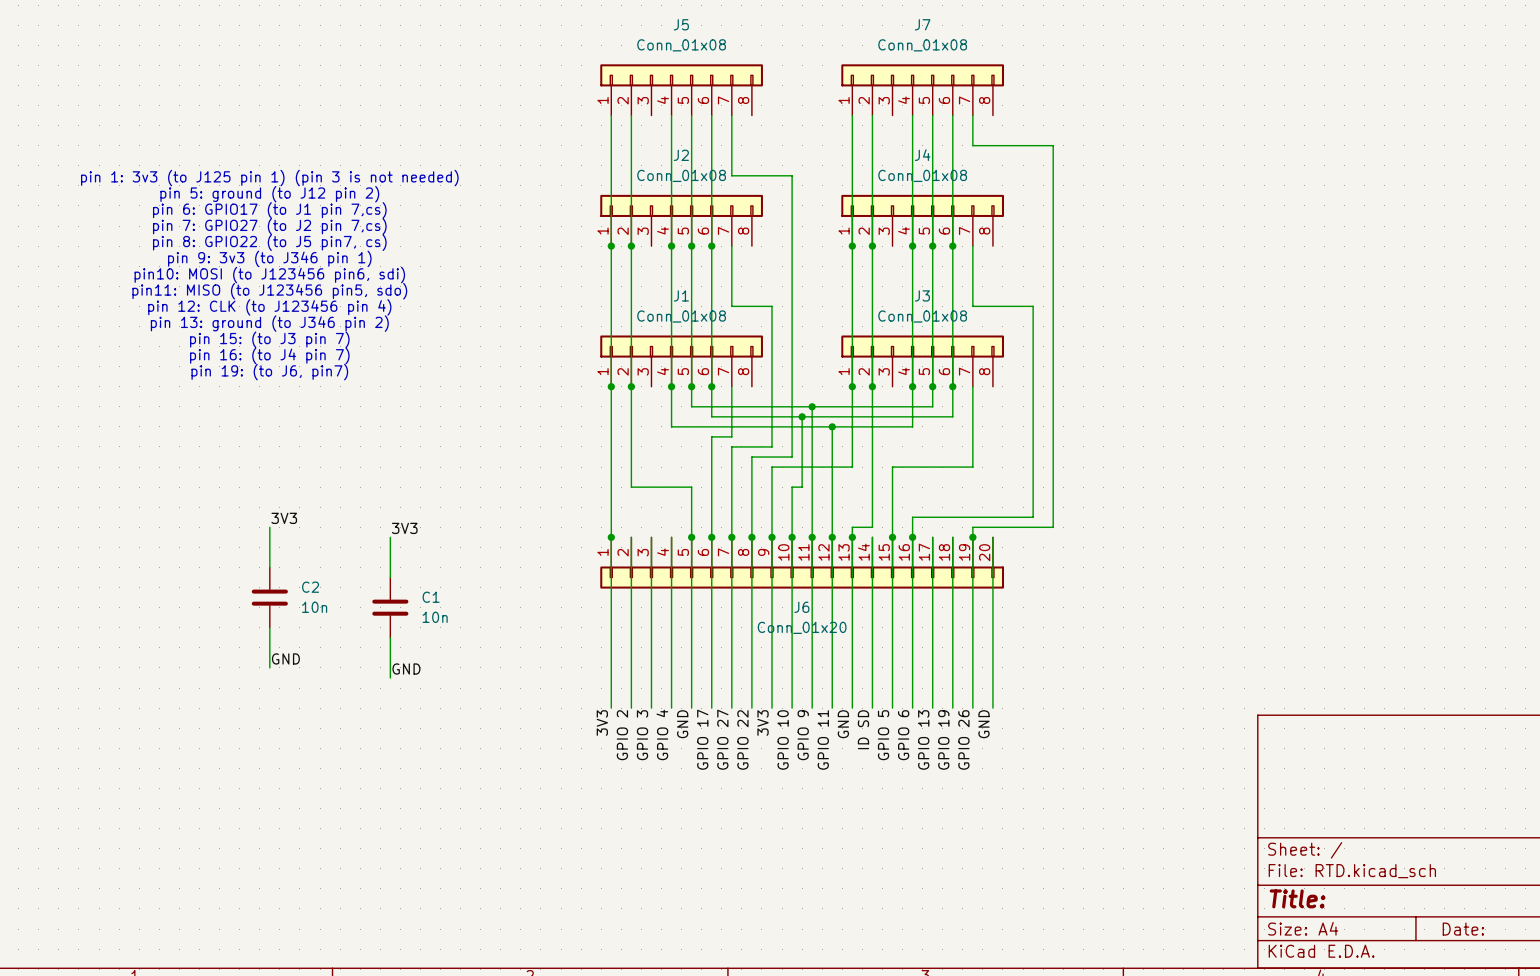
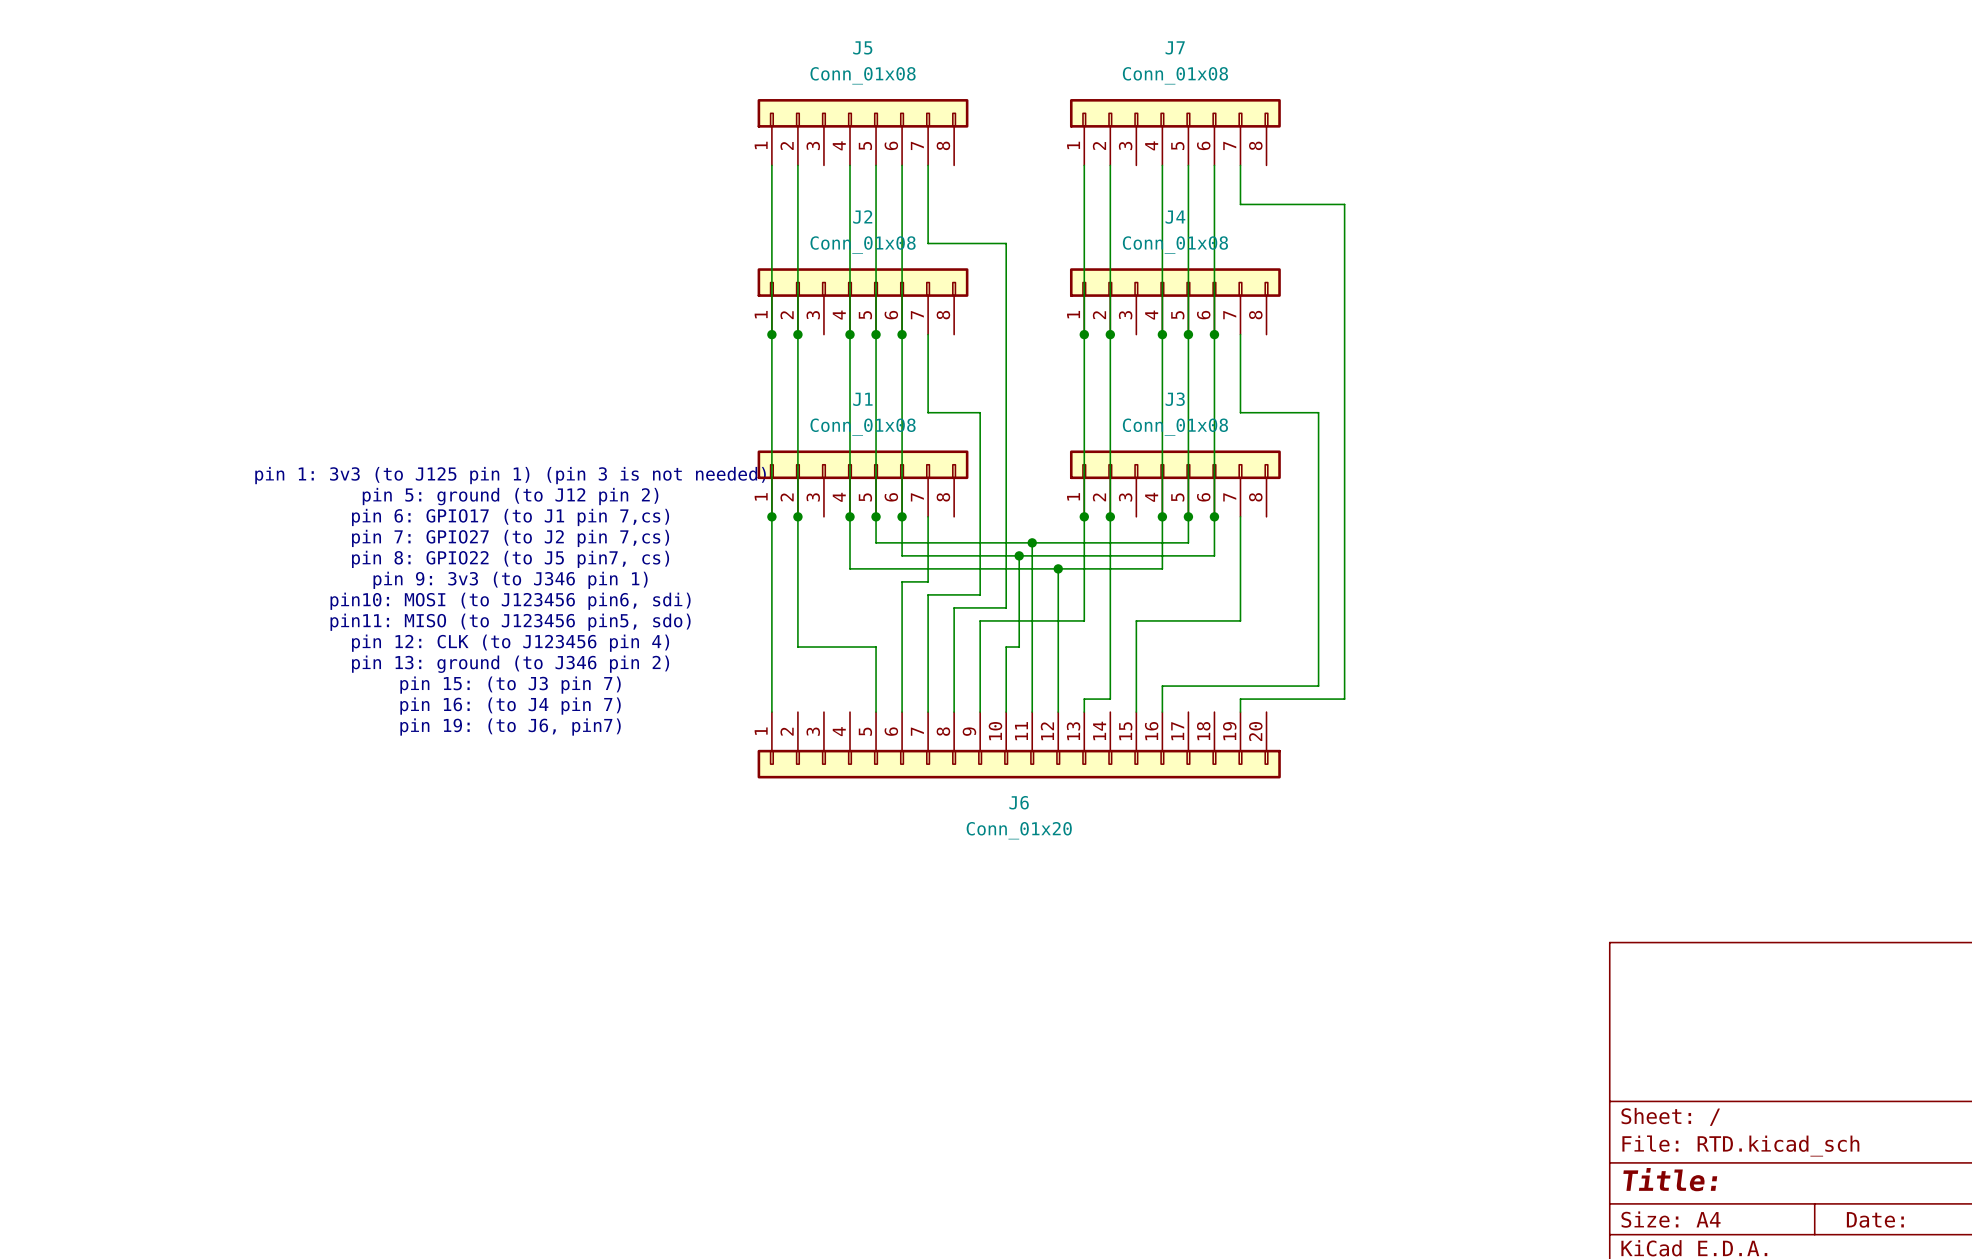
text: pin 1: 3v3 (to J125 pin 1) (pin 3 is not needed) (269, 178) -> none
text: pin 5: ground (to J12 pin 2) (269, 194) -> none
text: pin 6: GPIO17 (to J1 pin 7,cs) (269, 210) -> none
text: pin 7: GPIO27 (to J2 pin 7,cs) (269, 226) -> none
text: pin 8: GPIO22 (to J5 pin7, cs) (269, 242) -> none
text: pin 9: 3v3 (to J346 pin 1) (269, 258) -> none
text: pin10: MOSI (to J123456 pin6, sdi) (269, 275) -> none
text: pin11: MISO (to J123456 pin5, sdo) (269, 291) -> none
text: pin 12: CLK (to J123456 pin 4) (269, 307) -> none
text: pin 13: ground (to J346 pin 2) (269, 323) -> none
text: pin 15: (to J3 pin 7) (269, 339) -> none
text: none -> pin 1: 3v3 (to J125 pin 1) (pin 3 is not needed) (510, 475)
text: pin 16: (to J4 pin 7) (269, 355) -> none
text: none -> pin 5: ground (to J12 pin 2) (510, 496)
text: pin 19: (to J6, pin7) (269, 372) -> none
text: none -> pin 6: GPIO17 (to J1 pin 7,cs) (510, 517)
text: none -> pin 7: GPIO27 (to J2 pin 7,cs) (510, 538)
text: none -> pin 8: GPIO22 (to J5 pin7, cs) (510, 559)
text: none -> pin 9: 3v3 (to J346 pin 1) (510, 580)
text: none -> pin10: MOSI (to J123456 pin6, sdi) (510, 601)
text: none -> pin11: MISO (to J123456 pin5, sdo) (510, 622)
text: none -> pin 12: CLK (to J123456 pin 4) (510, 643)
text: none -> pin 13: ground (to J346 pin 2) (510, 664)
text: none -> pin 15: (to J3 pin 7) (510, 685)
label: 3V3 (284, 518) -> none
wire: (269, 527) (269, 567) -> none
label: 3V3 (404, 528) -> none
text: none -> pin 16: (to J4 pin 7) (510, 706)
wire: (390, 537) (390, 577) -> none
wire: (611, 537) (611, 708) -> none
junction: (611, 537) -> none
wire: (631, 537) (631, 708) -> none
wire: (651, 537) (651, 708) -> none
wire: (671, 537) (671, 708) -> none
wire: (691, 537) (691, 708) -> none
junction: (691, 537) -> none
wire: (711, 537) (711, 708) -> none
junction: (711, 537) -> none
wire: (731, 537) (731, 708) -> none
junction: (731, 537) -> none
wire: (751, 537) (751, 708) -> none
junction: (751, 537) -> none
wire: (771, 537) (771, 708) -> none
junction: (771, 537) -> none
wire: (792, 537) (792, 708) -> none
junction: (792, 537) -> none
wire: (812, 537) (812, 708) -> none
junction: (812, 537) -> none
wire: (832, 537) (832, 708) -> none
junction: (832, 537) -> none
wire: (852, 537) (852, 708) -> none
junction: (852, 537) -> none
wire: (872, 537) (872, 708) -> none
wire: (892, 537) (892, 708) -> none
junction: (892, 537) -> none
wire: (912, 537) (912, 708) -> none
junction: (912, 537) -> none
wire: (932, 537) (932, 708) -> none
wire: (952, 537) (952, 708) -> none
wire: (972, 537) (972, 708) -> none
junction: (972, 537) -> none
wire: (992, 537) (992, 708) -> none
text: none -> pin 19: (to J6, pin7) (510, 727)
C2: 10n (269, 597) -> none
C1: 10n (390, 607) -> none
wire: (269, 627) (269, 667) -> none
wire: (390, 637) (390, 677) -> none
label: GND (285, 658) -> none
label: GND (406, 669) -> none
label: 3V3 (602, 723) -> none
label: 3V3 (763, 723) -> none
label: GND (682, 724) -> none
label: GND (843, 724) -> none
label: GND (983, 724) -> none
label: ID SD (863, 729) -> none
label: GPIO 4 (662, 734) -> none
label: GPIO 2 (622, 735) -> none
label: GPIO 3 (642, 735) -> none
label: GPIO 9 (803, 735) -> none
label: GPIO 5 (883, 735) -> none
label: GPIO 6 (903, 735) -> none
label: GPIO 17 (702, 739) -> none
label: GPIO 27 (722, 739) -> none
label: GPIO 22 (742, 739) -> none
label: GPIO 10 (783, 739) -> none
label: GPIO 11 (823, 739) -> none
label: GPIO 13 (923, 739) -> none
label: GPIO 19 (943, 739) -> none
label: GPIO 26 (963, 739) -> none

